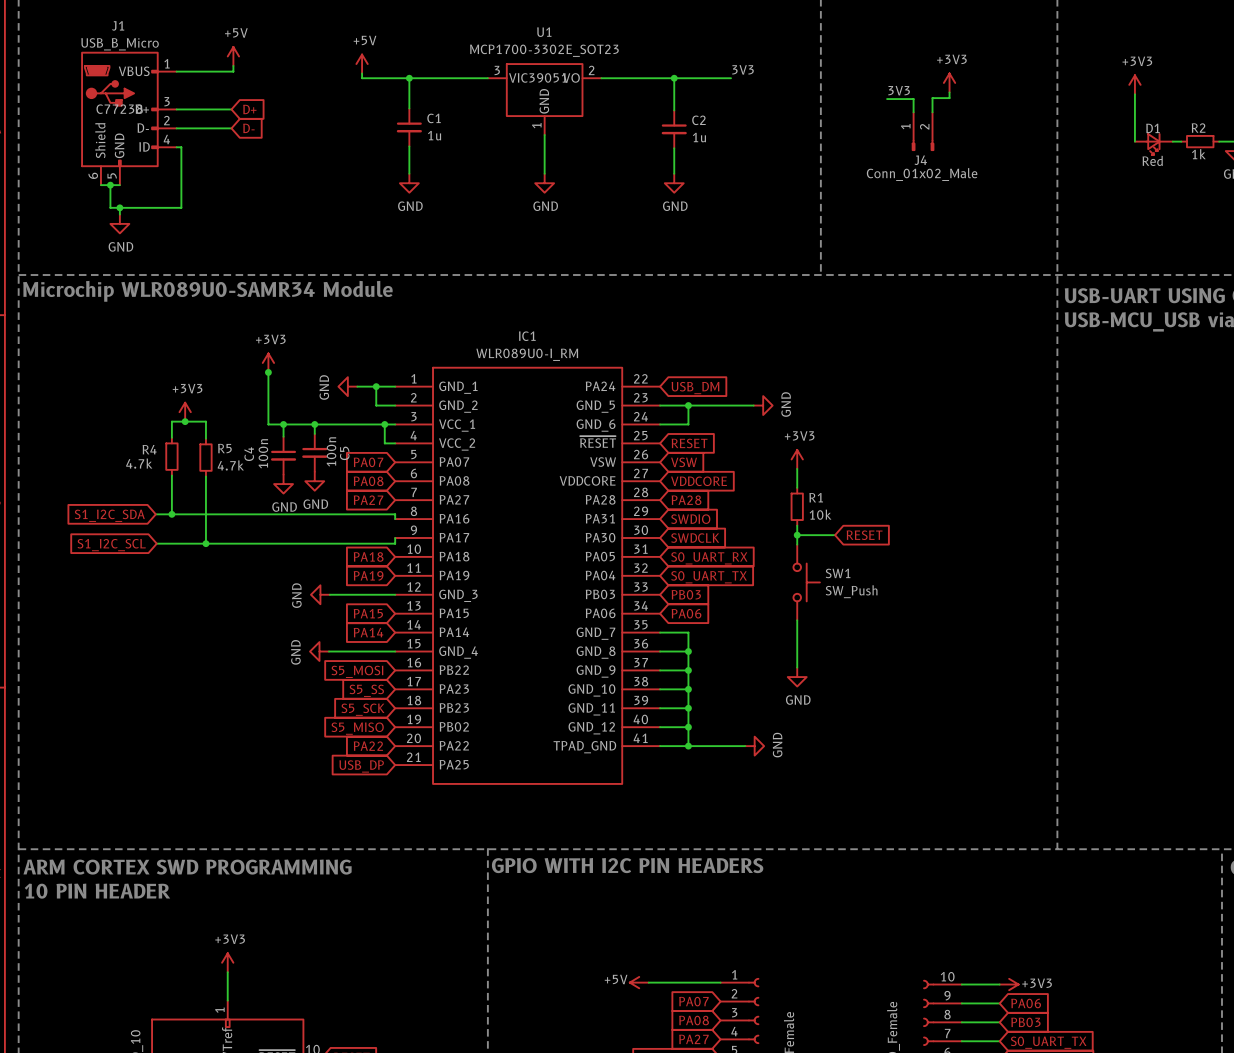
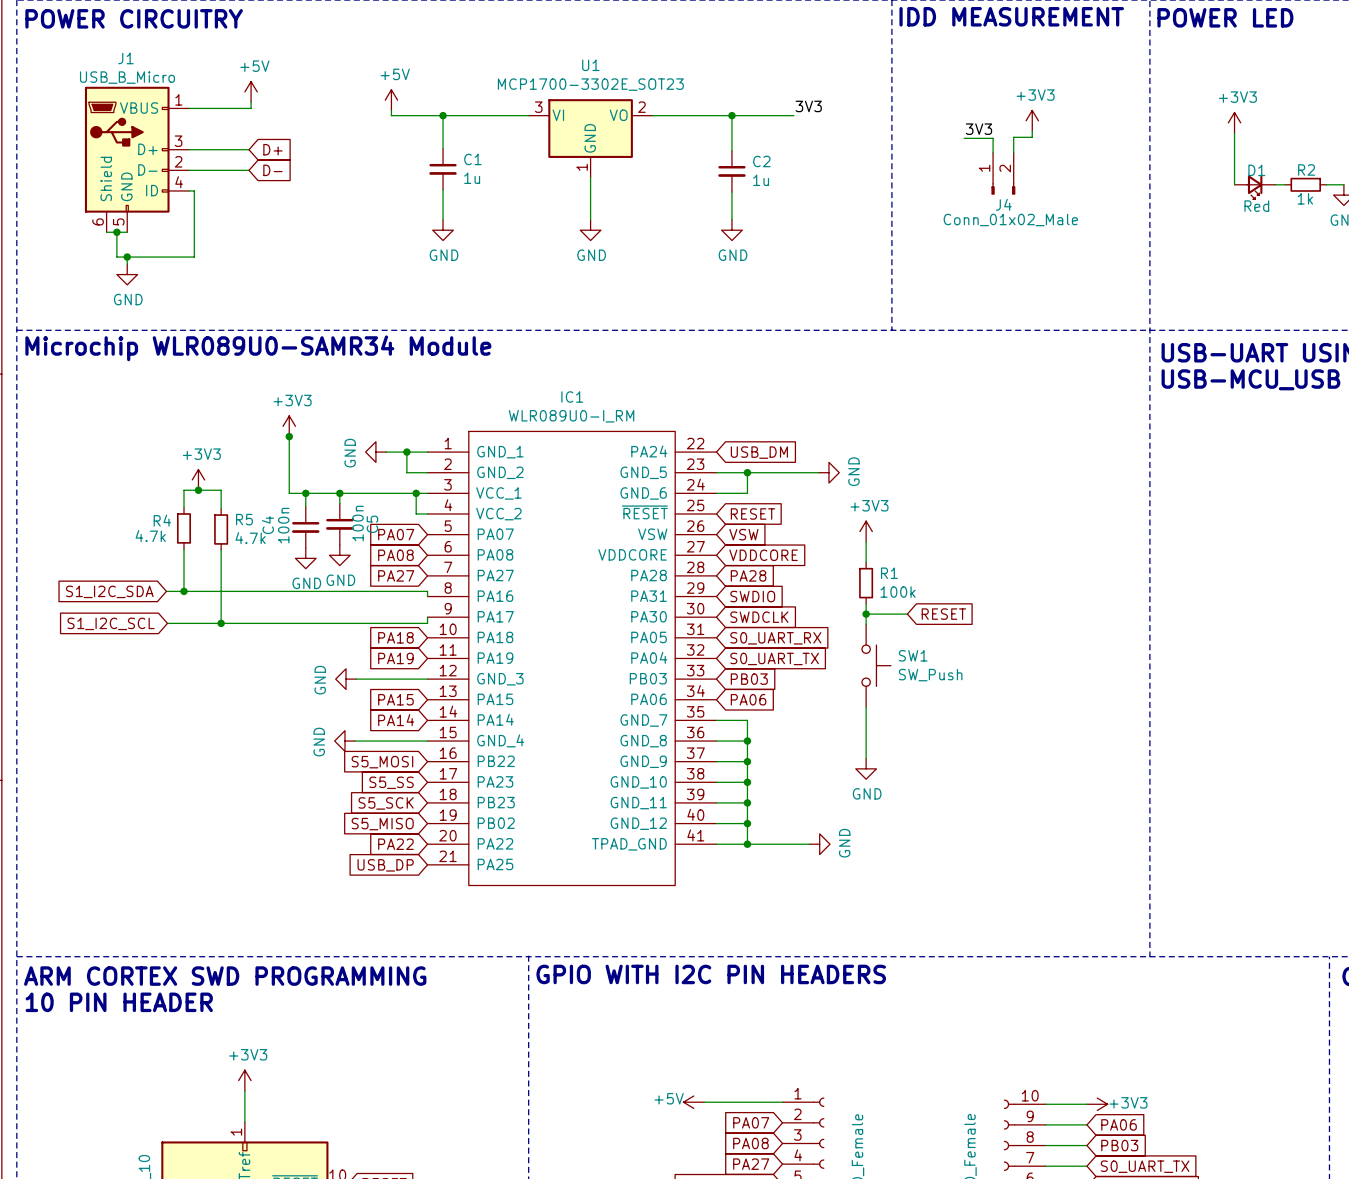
U1 text: C39051 (544, 77) -> none
J1 text: C77238 (119, 109) -> none
R1 value: 10k (820, 514) -> 100k (898, 592)

